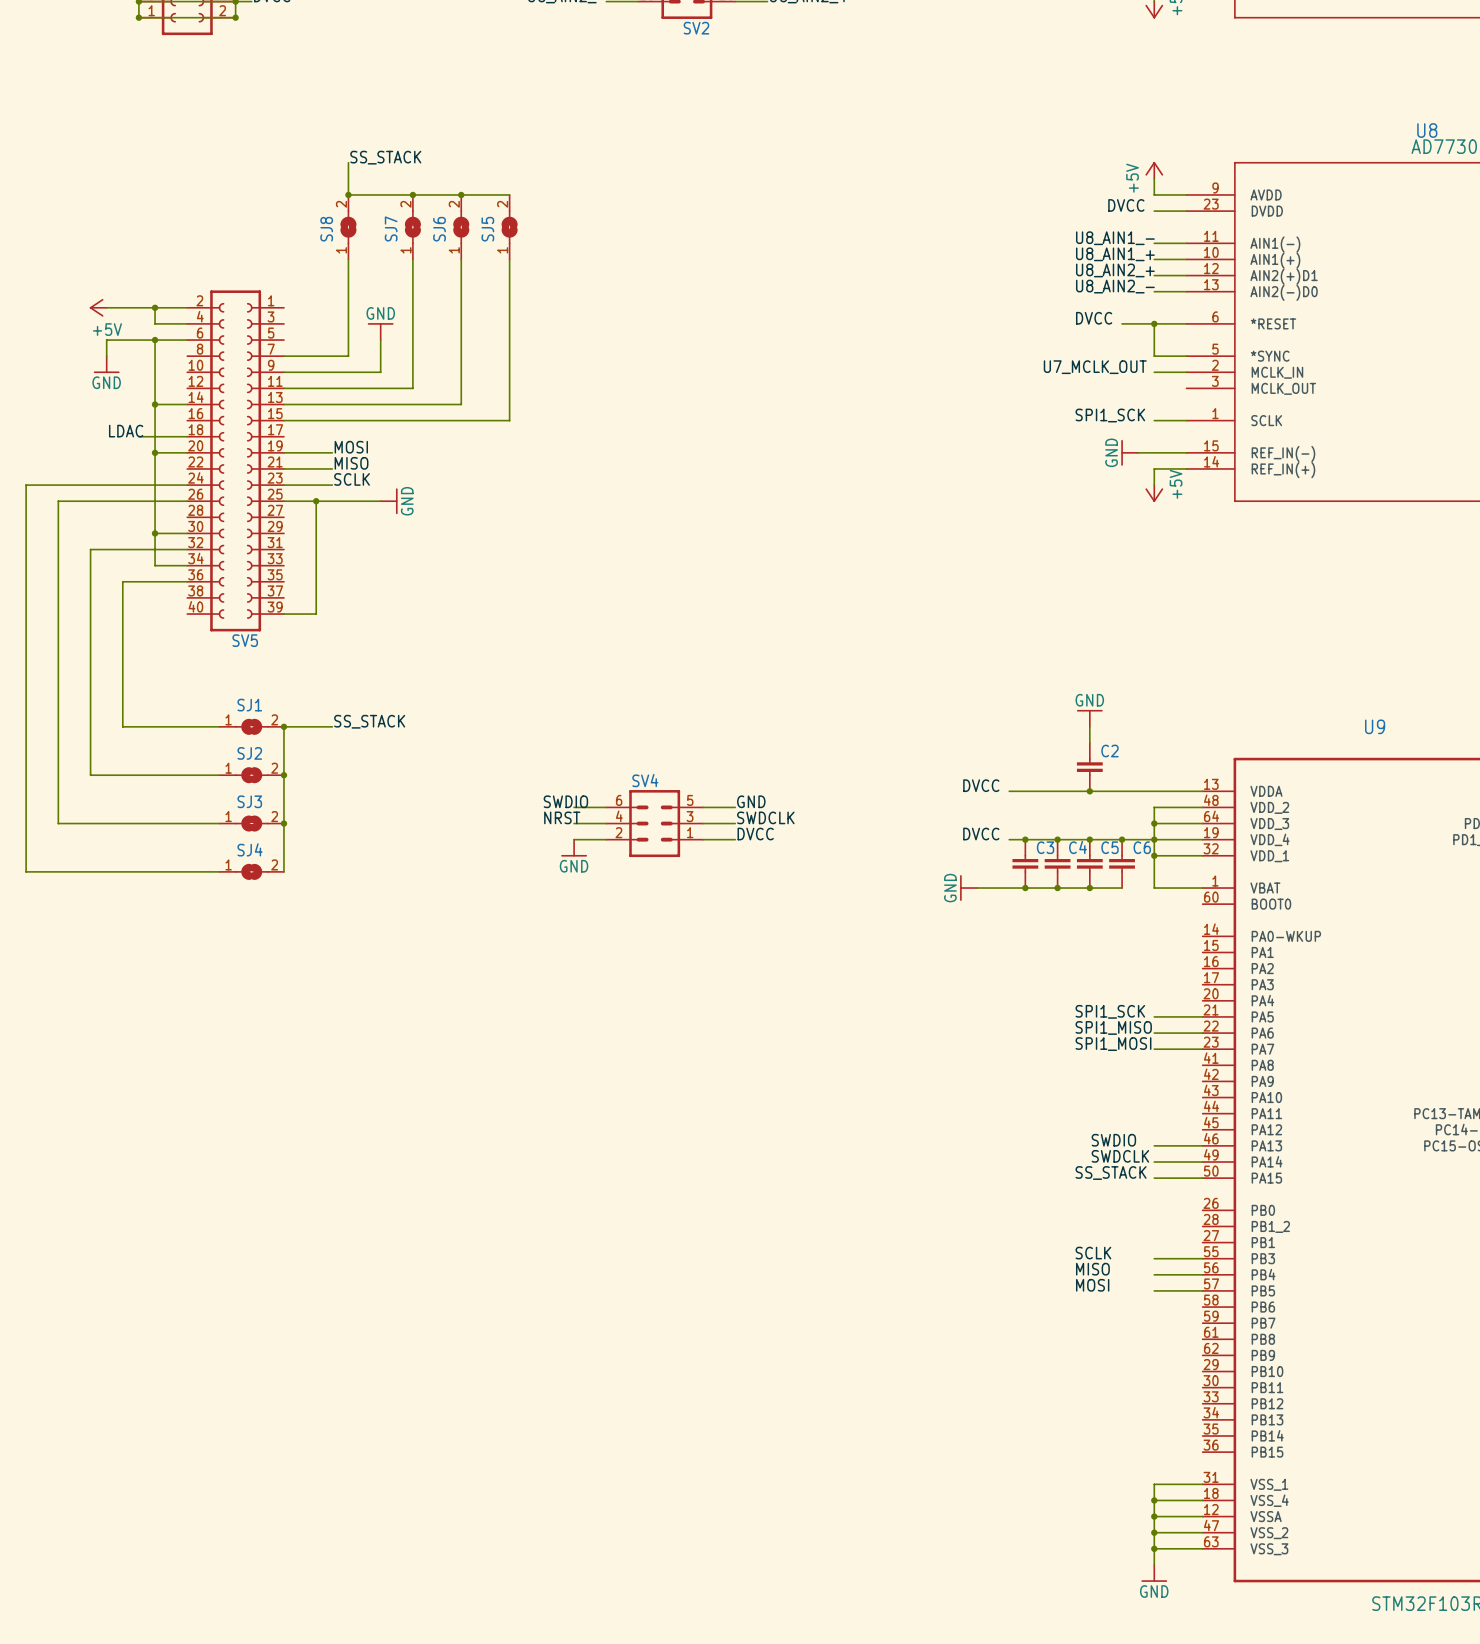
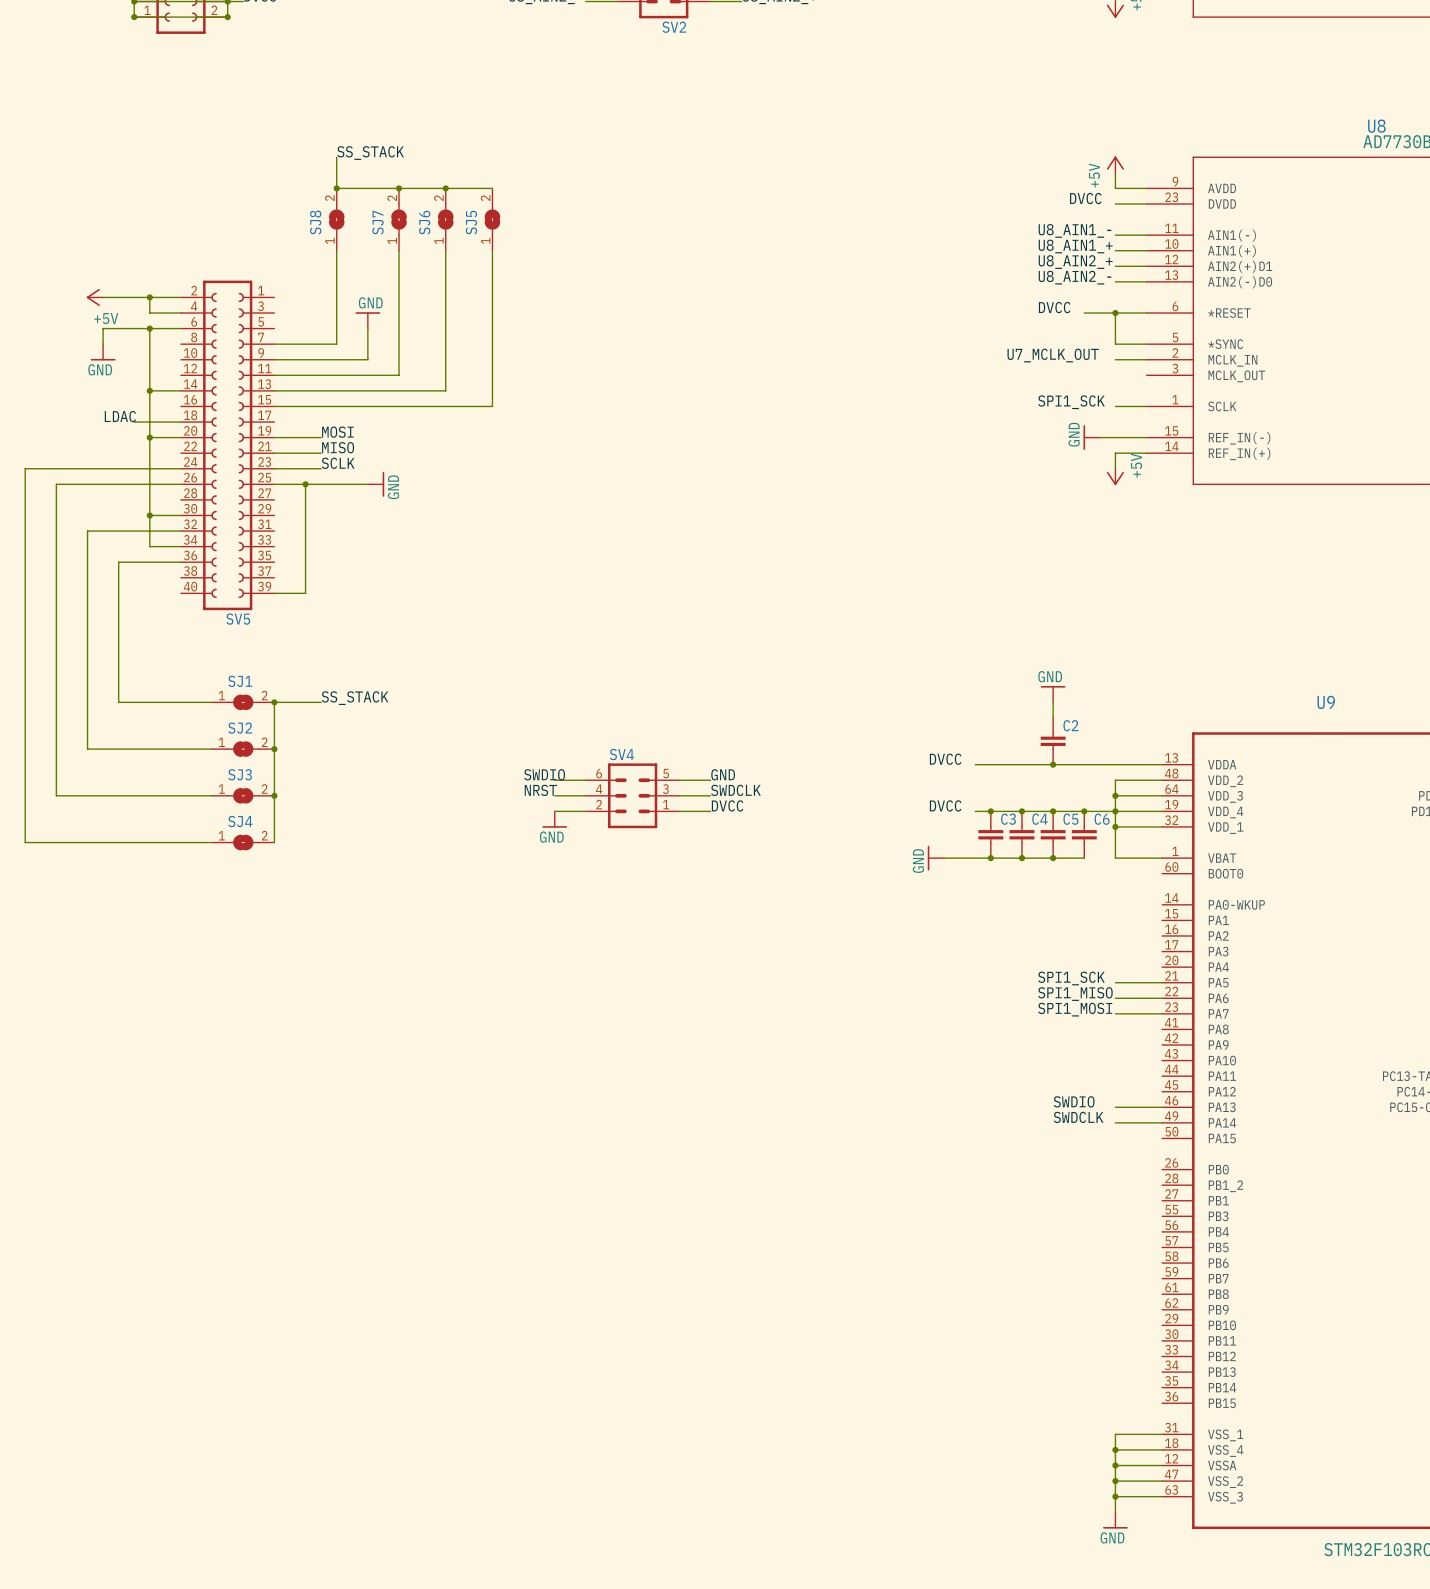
label: SS_STACK (1111, 1173) -> none
wire: (1154, 1178) (1202, 1178) -> none
label: SCLK (1093, 1253) -> none
wire: (1154, 1258) (1202, 1258) -> none
label: MISO (1092, 1269) -> none
wire: (1154, 1274) (1202, 1274) -> none
label: MOSI (1092, 1285) -> none
wire: (1154, 1290) (1202, 1290) -> none

